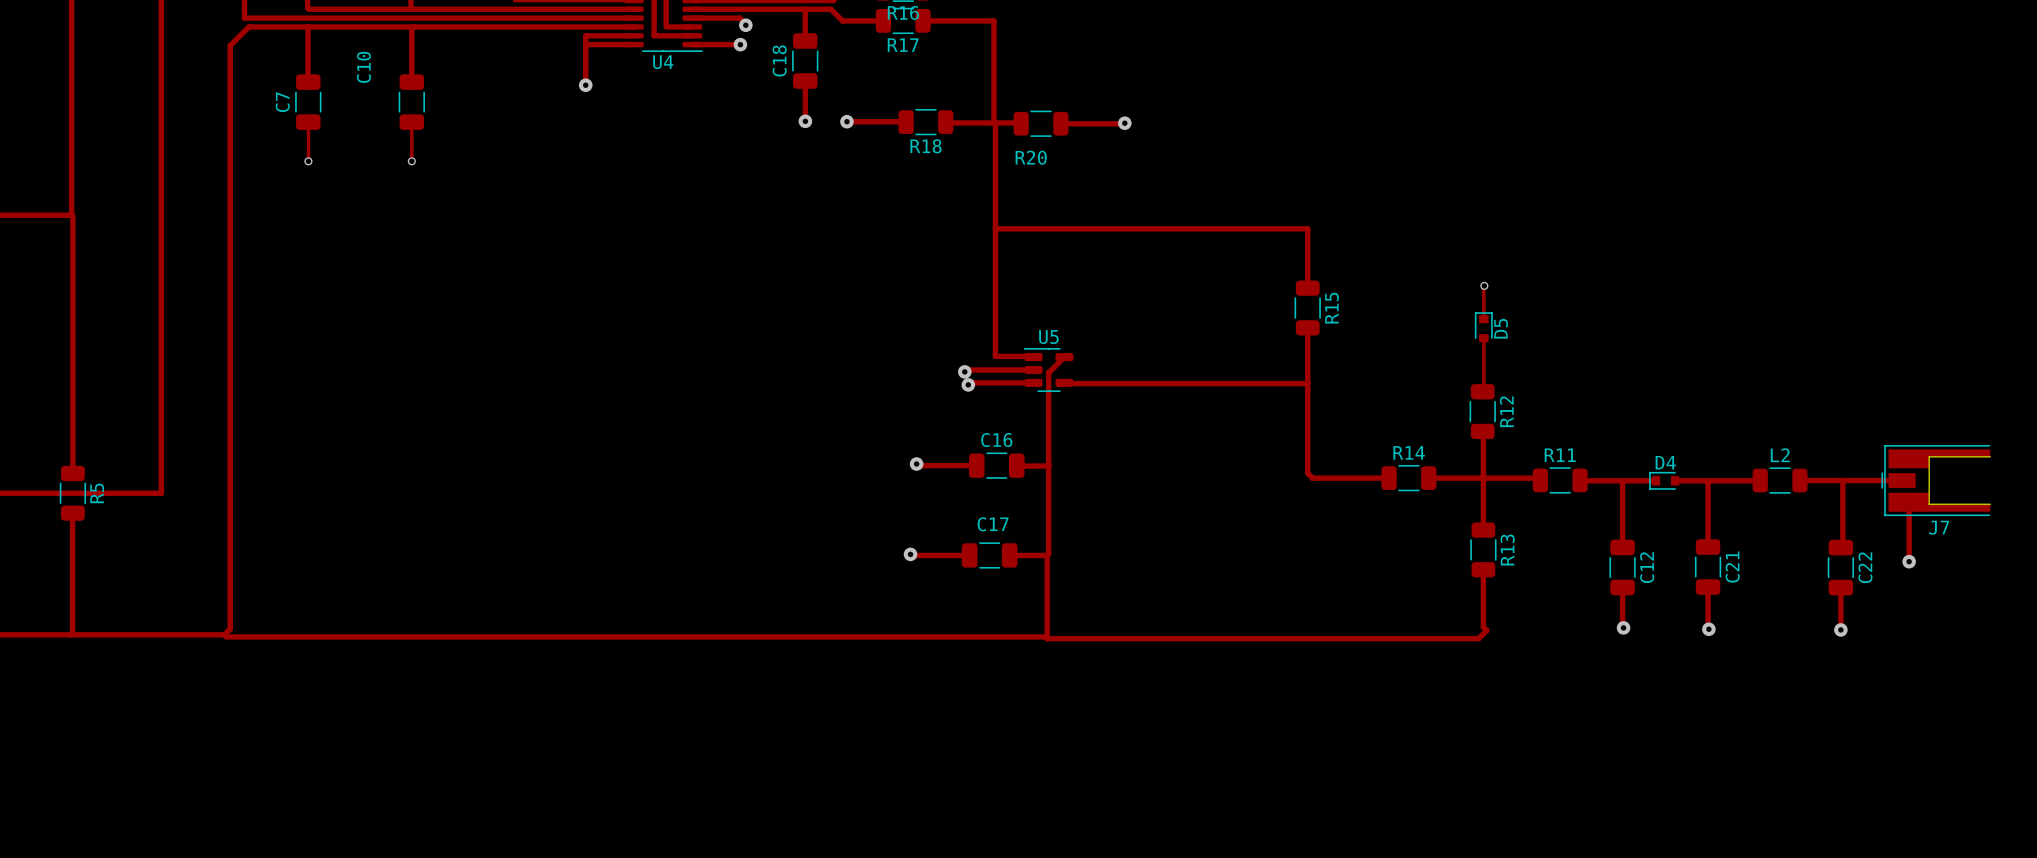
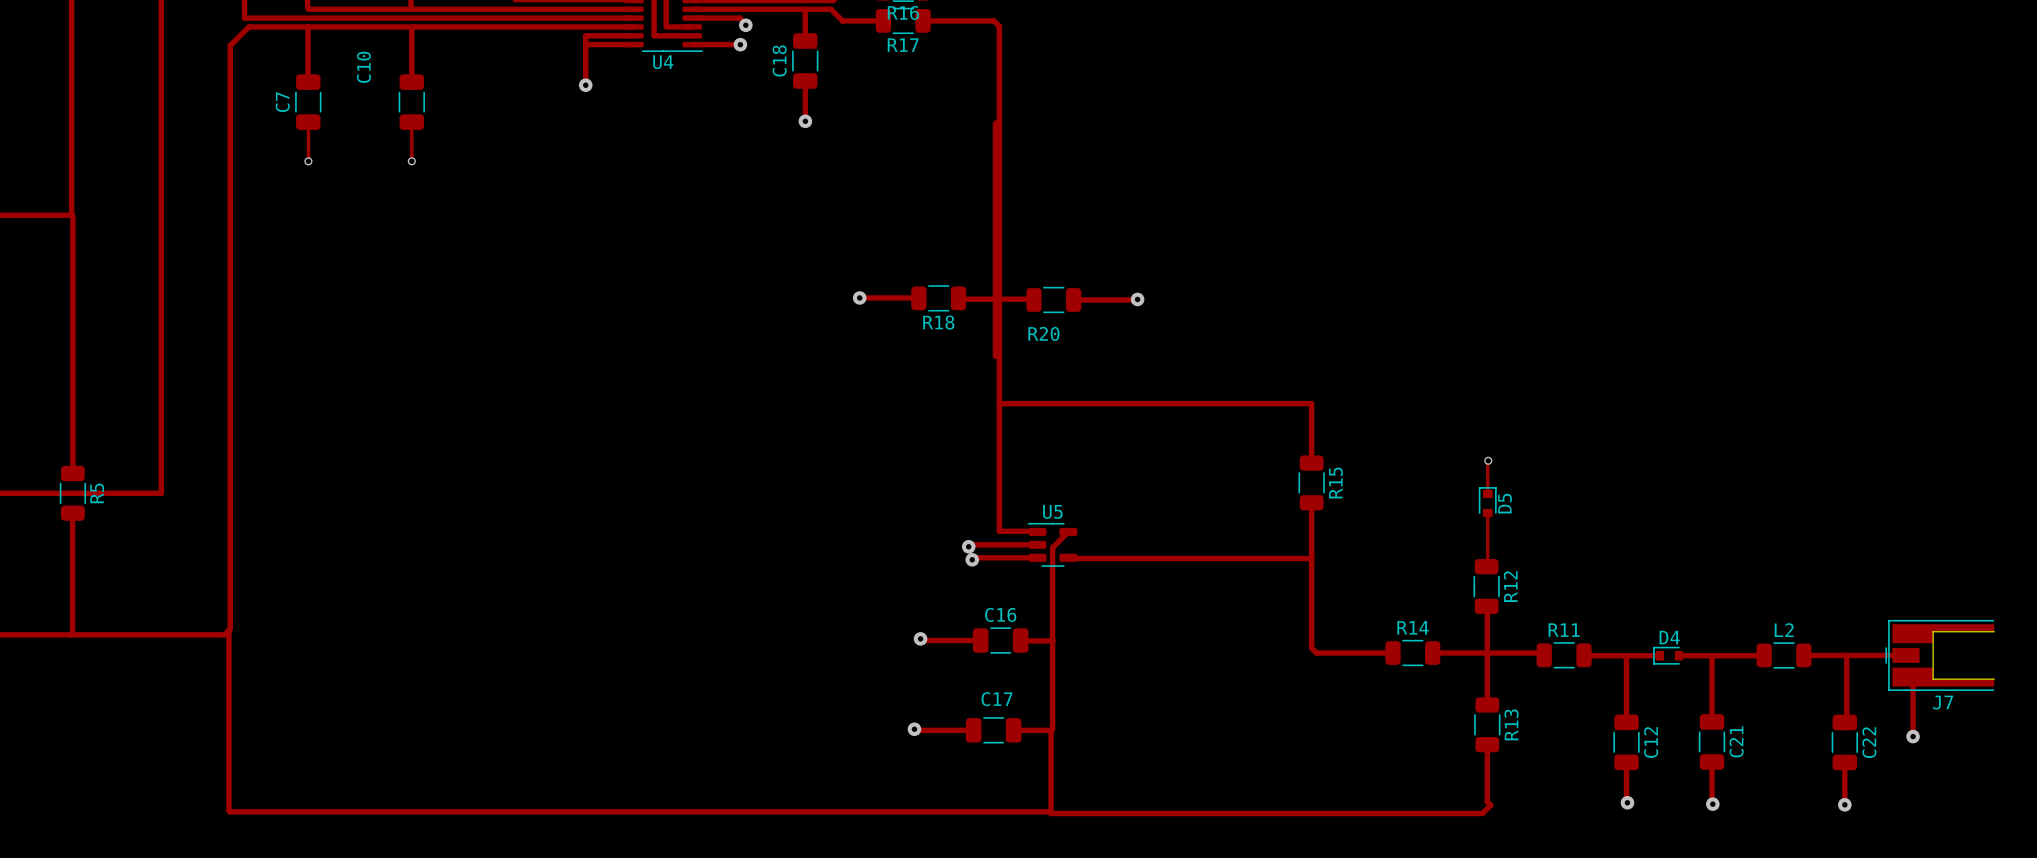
track: (993, 20) (995, 122) -> (993, 20) (999, 26) (999, 531)
track: (846, 121) (906, 122) -> (859, 297) (918, 298)
via: (846, 121) -> none
R18 position: (925, 122) -> (938, 298)
track: (945, 122) (1021, 123) (1019, 122) -> (958, 298) (1033, 299) (1032, 298)
R20 position: (1041, 123) -> (1053, 299)
track: (1124, 123) (1060, 123) -> (1137, 299) (1073, 299)
via: (1124, 123) -> none
track: (995, 228) (1307, 228) (1307, 288) -> (999, 403) (1311, 403) (1311, 463)
track: (1484, 285) (1483, 319) -> (1488, 460) (1487, 494)
via: (1484, 285) -> none
via: none -> (859, 297)
via: none -> (1137, 299)
R15 position: (1307, 308) -> (1311, 482)
track: (1307, 327) (1307, 473) (1312, 478) (1389, 478) -> (1311, 502) (1311, 648) (1316, 653) (1393, 653)
D5 position: (1483, 327) -> (1487, 502)
track: (1483, 338) (1482, 391) -> (1487, 512) (1486, 566)
track: (995, 356) (1032, 356) (1032, 358) -> (999, 531) (1036, 531) (1036, 532)
track: (1064, 357) (1048, 372) (1048, 554) -> (1068, 531) (1052, 547) (1052, 728)
track: (1033, 369) (966, 369) (964, 371) -> (1037, 544) (970, 544) (968, 546)
U5 position: (1048, 369) -> (1052, 544)
via: (964, 371) -> none
track: (1033, 382) (970, 382) (968, 384) -> (1037, 557) (974, 557) (972, 559)
track: (1064, 382) (1307, 383) -> (1068, 557) (1311, 558)
via: (968, 384) -> none
R12 position: (1482, 411) -> (1486, 586)
track: (1482, 431) (1483, 530) -> (1486, 606) (1487, 704)
via: none -> (1488, 460)
track: (916, 464) (918, 465) (976, 465) -> (920, 638) (922, 640) (980, 640)
via: (916, 464) -> none
track: (1048, 464) (1048, 466) (1016, 465) -> (1052, 638) (1052, 640) (1020, 640)
C16 position: (996, 465) -> (1000, 640)
R14 position: (1408, 478) -> (1412, 653)
track: (1428, 478) (1538, 478) (1540, 480) -> (1432, 653) (1541, 653) (1544, 655)
R11 position: (1560, 480) -> (1564, 655)
track: (1580, 480) (1656, 480) -> (1583, 655) (1660, 655)
track: (1620, 480) (1622, 483) (1622, 547) -> (1624, 655) (1626, 658) (1626, 722)
D4 position: (1664, 480) -> (1668, 655)
track: (1708, 480) (1708, 547) -> (1712, 655) (1712, 721)
track: (1760, 480) (1675, 480) -> (1764, 655) (1679, 655)
L2 position: (1780, 480) -> (1784, 655)
track: (1799, 480) (1902, 480) -> (1803, 655) (1906, 655)
track: (1842, 480) (1842, 545) (1840, 547) (1842, 546) -> (1846, 655) (1846, 720) (1844, 722) (1846, 720)
J7 position: (1936, 480) -> (1940, 655)
track: (1908, 502) (1909, 561) -> (1912, 677) (1913, 736)
via: none -> (968, 546)
R13 position: (1483, 549) -> (1487, 724)
track: (910, 554) (969, 555) -> (914, 729) (973, 730)
via: (910, 554) -> none
track: (1048, 554) (1009, 555) -> (1052, 728) (1013, 730)
track: (1048, 554) (1047, 638) -> (1052, 728) (1051, 813)
C17 position: (989, 555) -> (993, 730)
via: none -> (972, 559)
via: (1909, 561) -> none
C12 position: (1622, 567) -> (1626, 742)
C21 position: (1708, 567) -> (1712, 741)
C22 position: (1840, 567) -> (1844, 742)
track: (1483, 569) (1483, 627) (1486, 630) (1478, 638) (1047, 638) -> (1487, 744) (1487, 802) (1490, 805) (1482, 813) (1051, 813)
track: (1622, 587) (1623, 627) -> (1626, 762) (1627, 802)
track: (1708, 587) (1708, 629) -> (1712, 761) (1712, 804)
track: (1840, 587) (1840, 629) -> (1844, 762) (1844, 804)
via: (1623, 627) -> none
via: (1708, 629) -> none
via: (1840, 629) -> none
track: none -> (228, 630) (229, 811) (1049, 811) (1051, 813)
track: (226, 636) (1045, 636) (1047, 638) -> none
via: none -> (920, 638)
via: none -> (914, 729)
via: none -> (1913, 736)
via: none -> (1627, 802)
via: none -> (1712, 804)
via: none -> (1844, 804)

